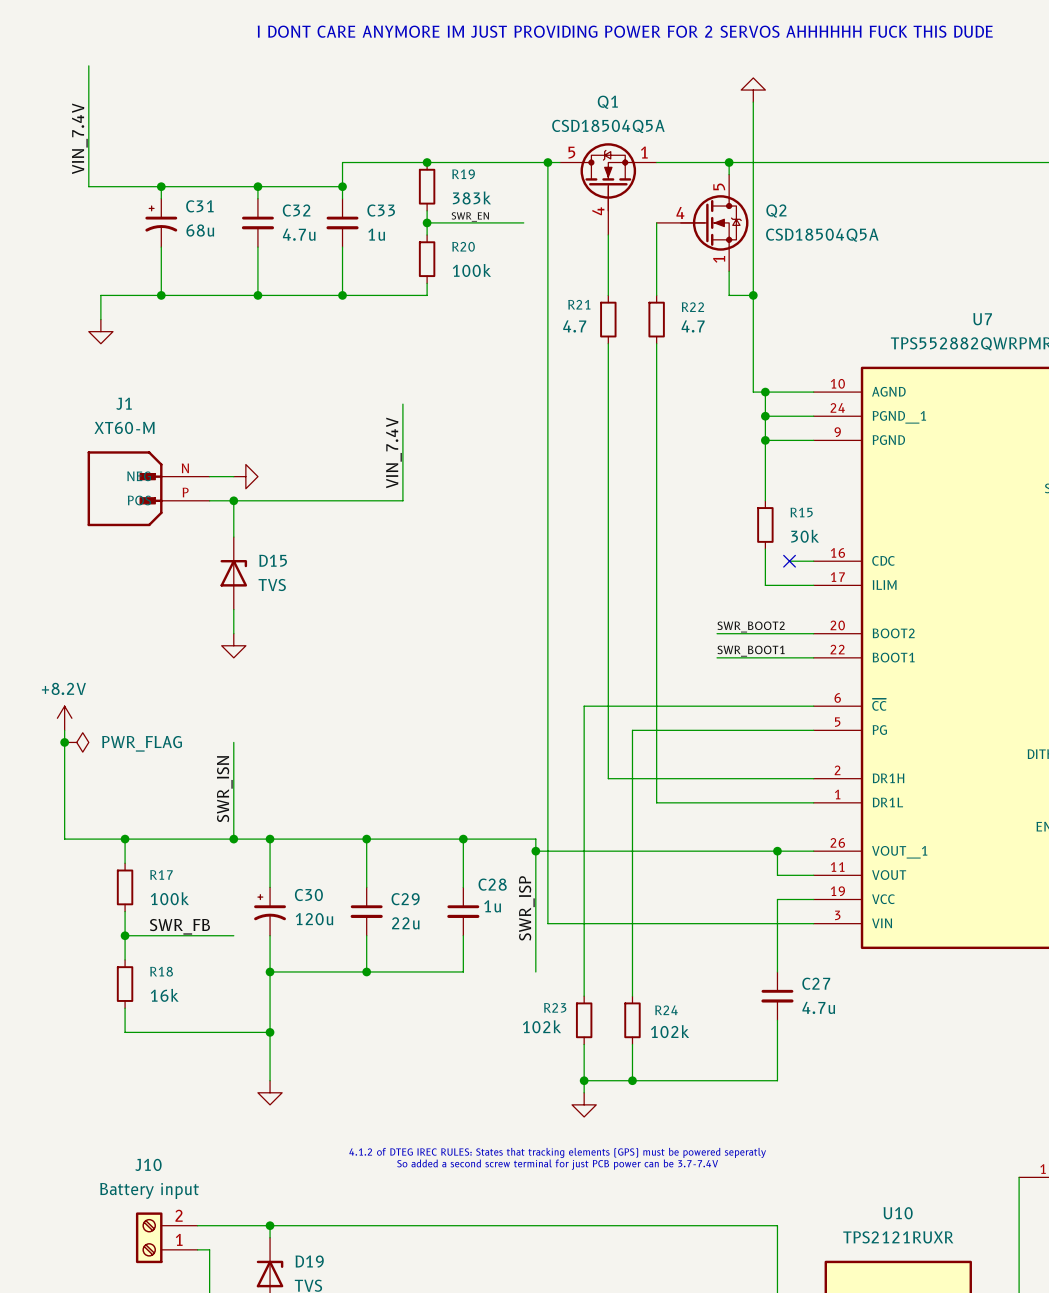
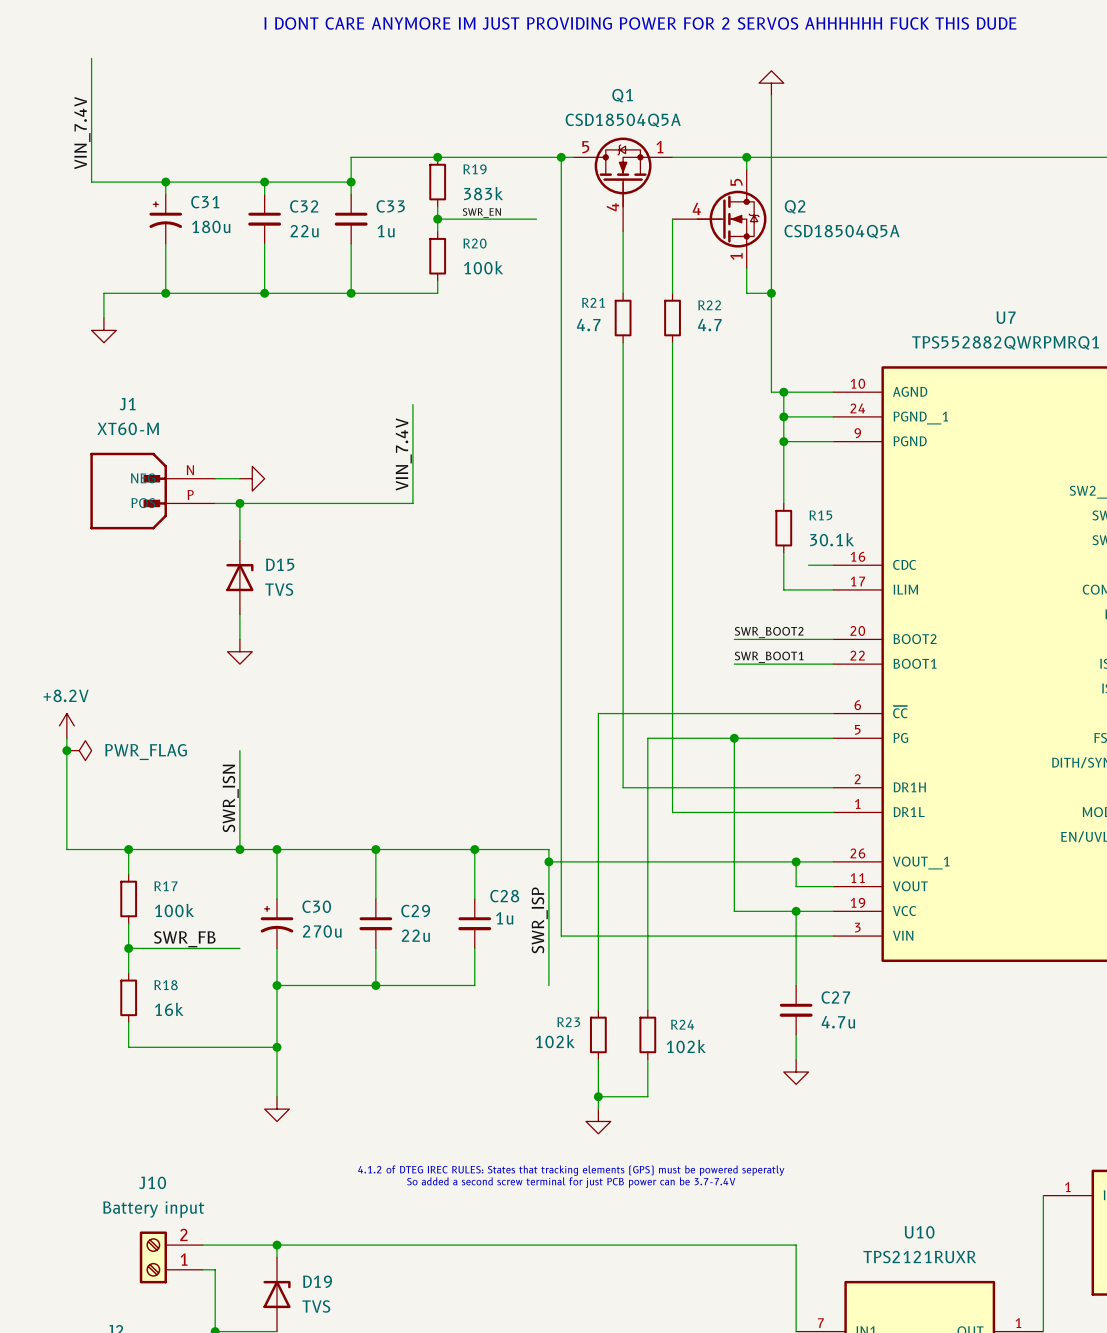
C31 value: 68u (200, 230) -> 180u (211, 226)
C32 value: 4.7u (299, 234) -> 22u (304, 231)
R15 value: 30k (805, 536) -> 30.1k (832, 539)
no-connect mark: (789, 561) -> none
wire: none -> (734, 738) (734, 911) (796, 911)
junction: none -> (734, 738)
junction: none -> (796, 911)
C30 value: 120u (314, 919) -> 270u (322, 931)
wire: (777, 1044) (777, 1080) (632, 1080) -> none
power symbol: none -> (796, 1072)
junction: (632, 1080) -> none

